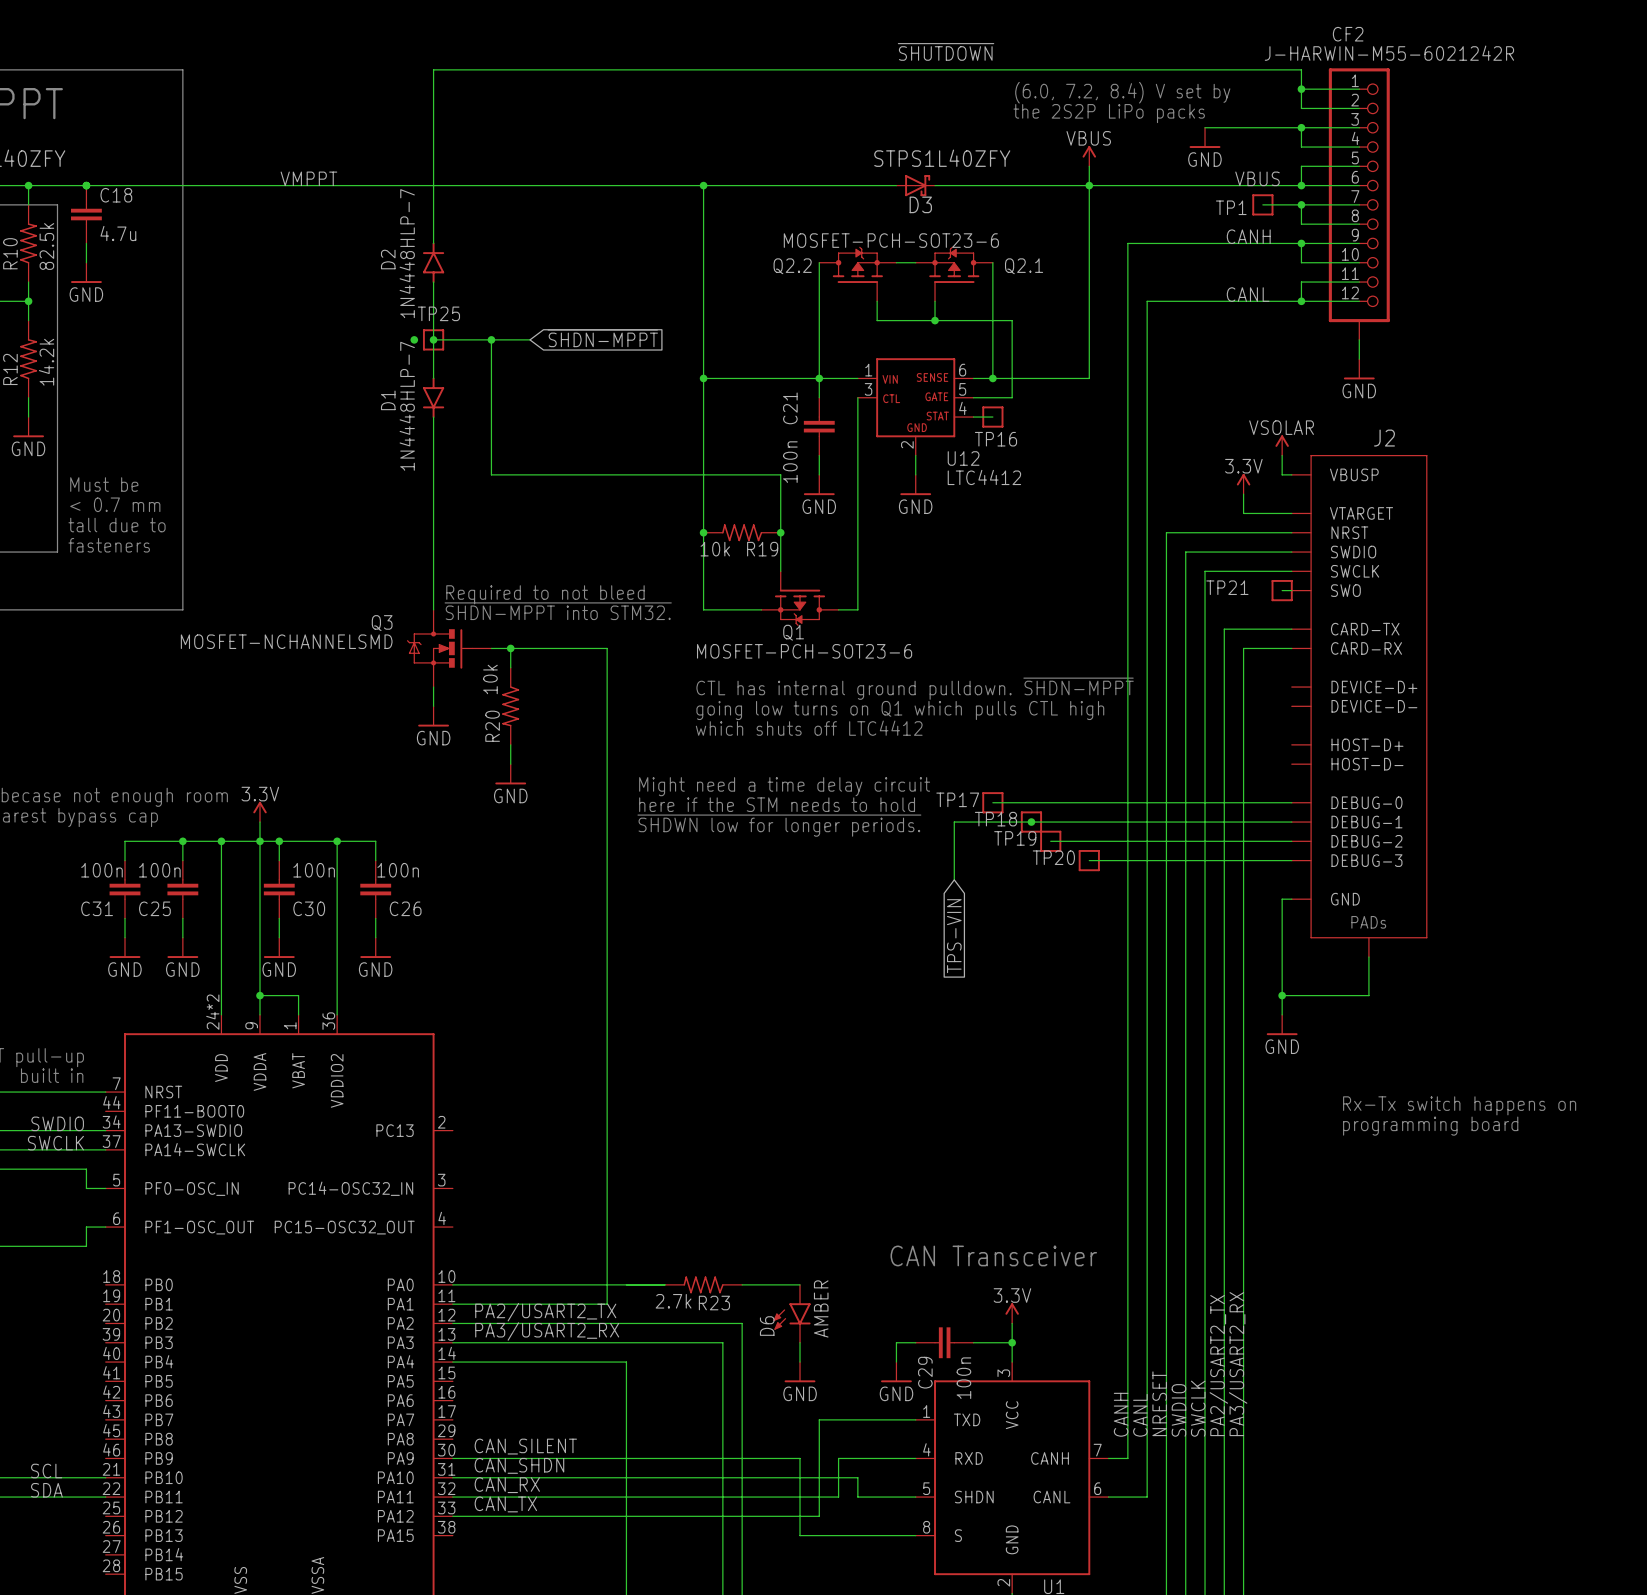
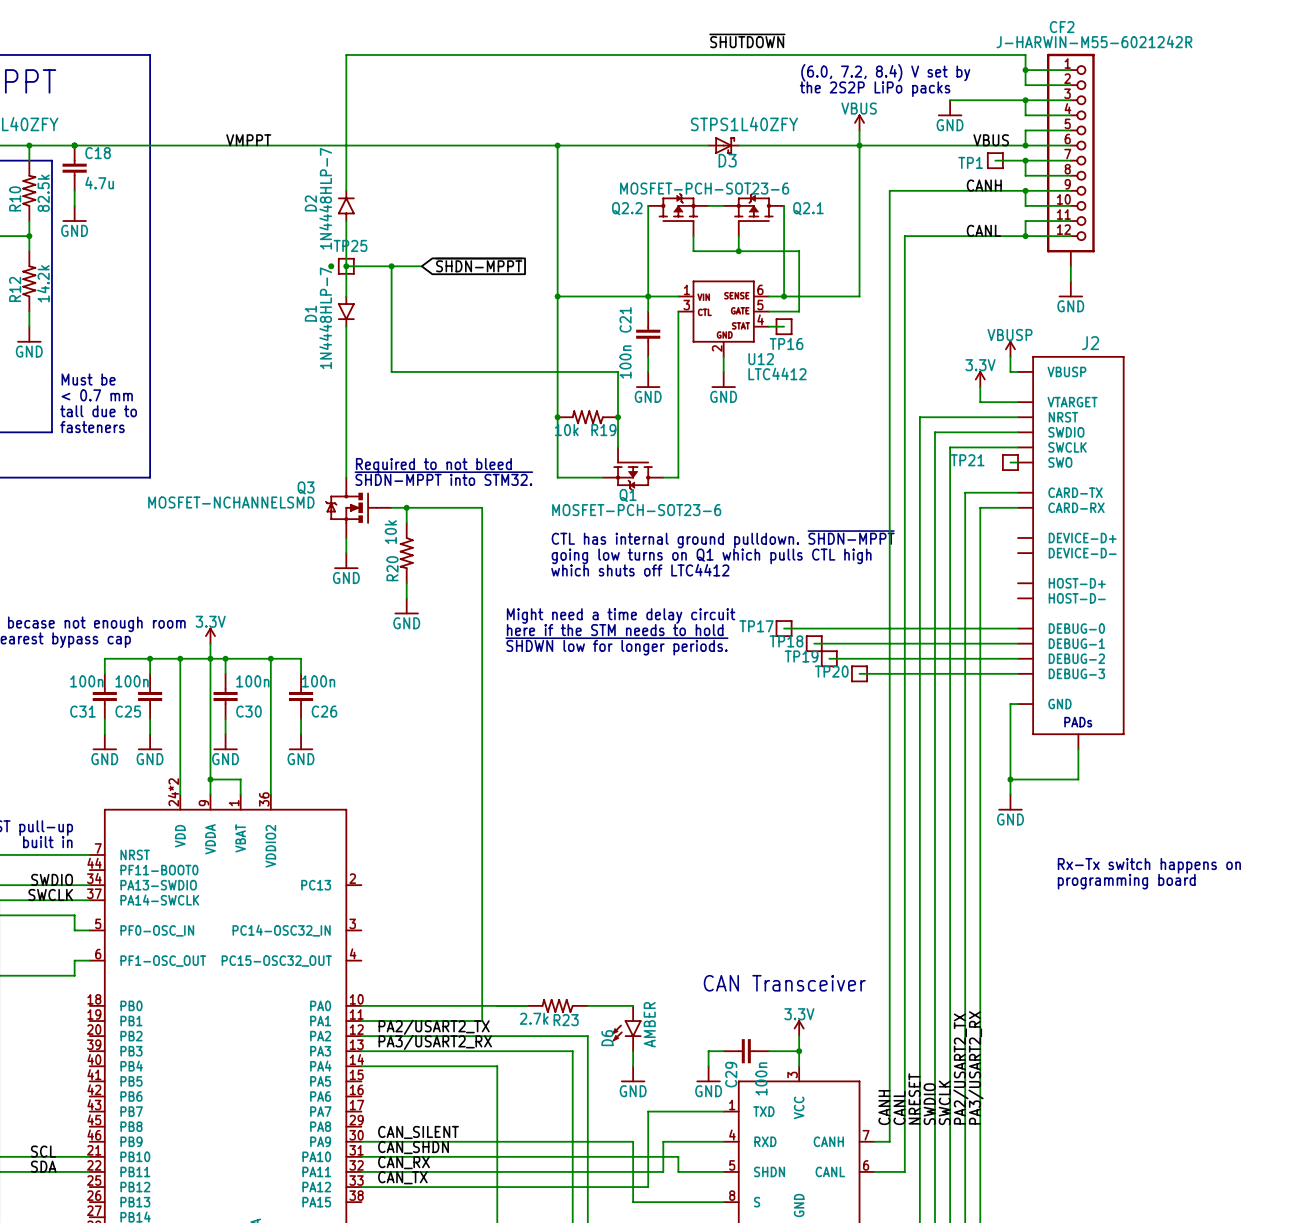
power symbol: VSOLAR (1282, 445) -> VBUSP (1010, 348)
wire: (1031, 822) (954, 822) (954, 879) -> none
junction: (1031, 822) -> none
global label: TPS-VIN (954, 936) -> none

